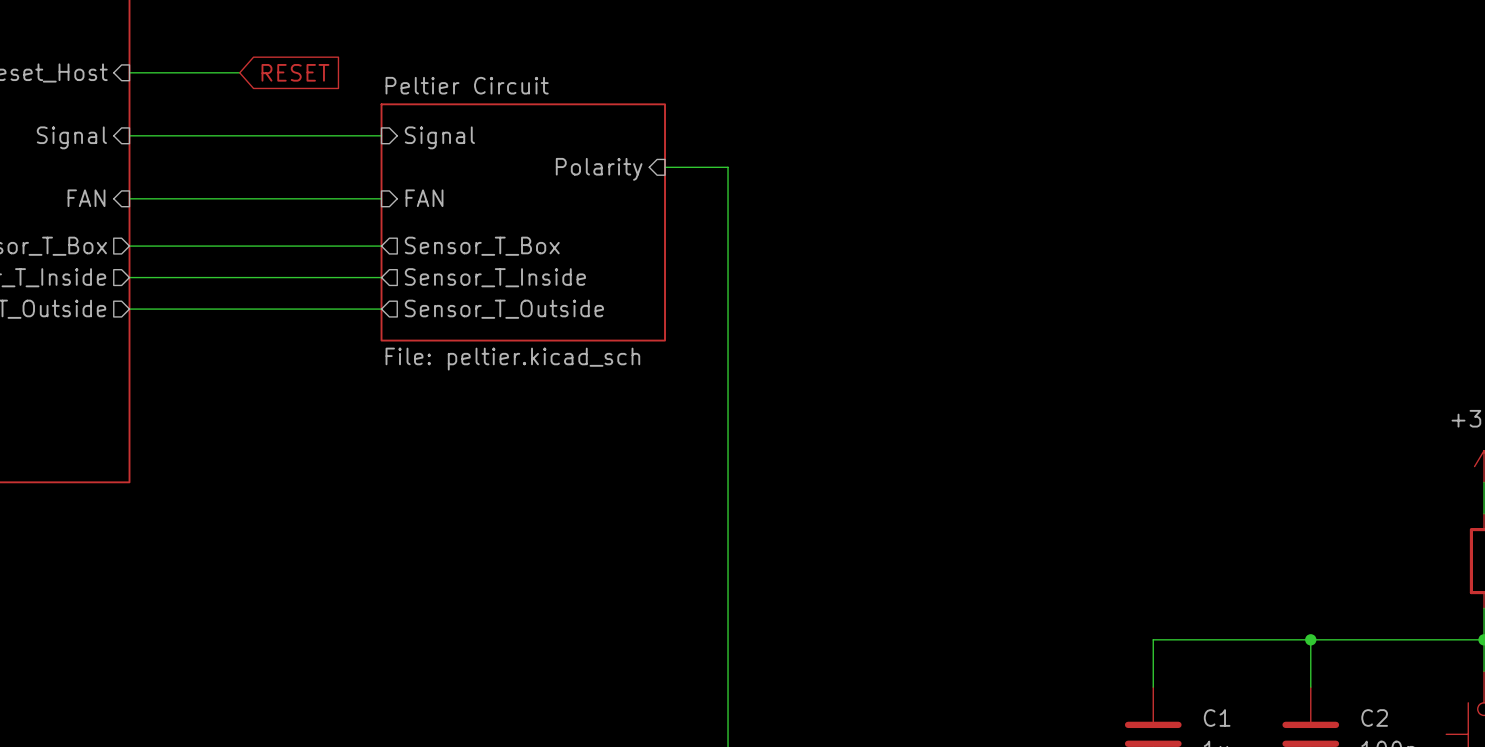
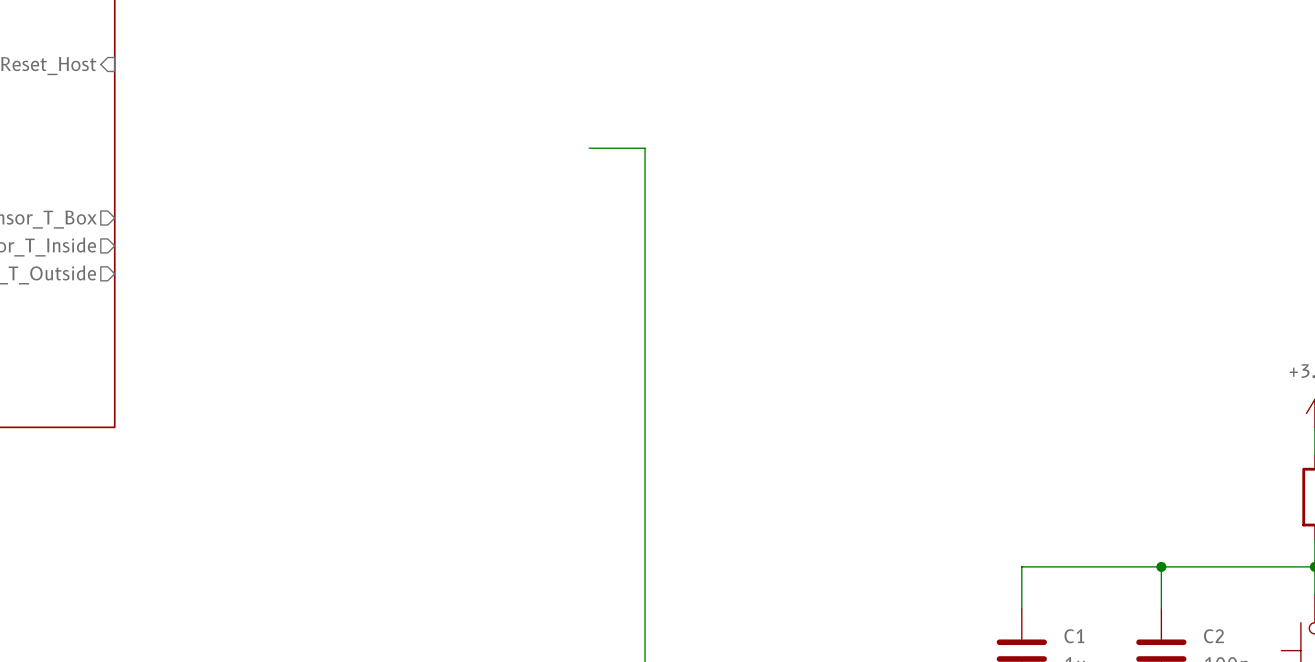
wire: (129, 72) (239, 72) -> none
global label: RESET (295, 72) -> none
wire: (129, 135) (381, 135) -> none
sheet pin: Signal (71, 137) -> none
sheet pin: Signal (439, 137) -> none
sheet pin: Polarity (599, 169) -> none
sheet pin: FAN (86, 198) -> none
wire: (129, 198) (381, 198) -> none
sheet pin: FAN (424, 198) -> none
sheet Peltier Circuit: File: peltier.kicad_sch (523, 222) -> none
wire: (129, 246) (381, 246) -> none
sheet pin: Sensor_T_Box (482, 246) -> none
wire: (129, 277) (381, 277) -> none
sheet pin: Sensor_T_Inside (495, 277) -> none
wire: (129, 309) (381, 309) -> none
sheet pin: Sensor_T_Outside (504, 309) -> none

